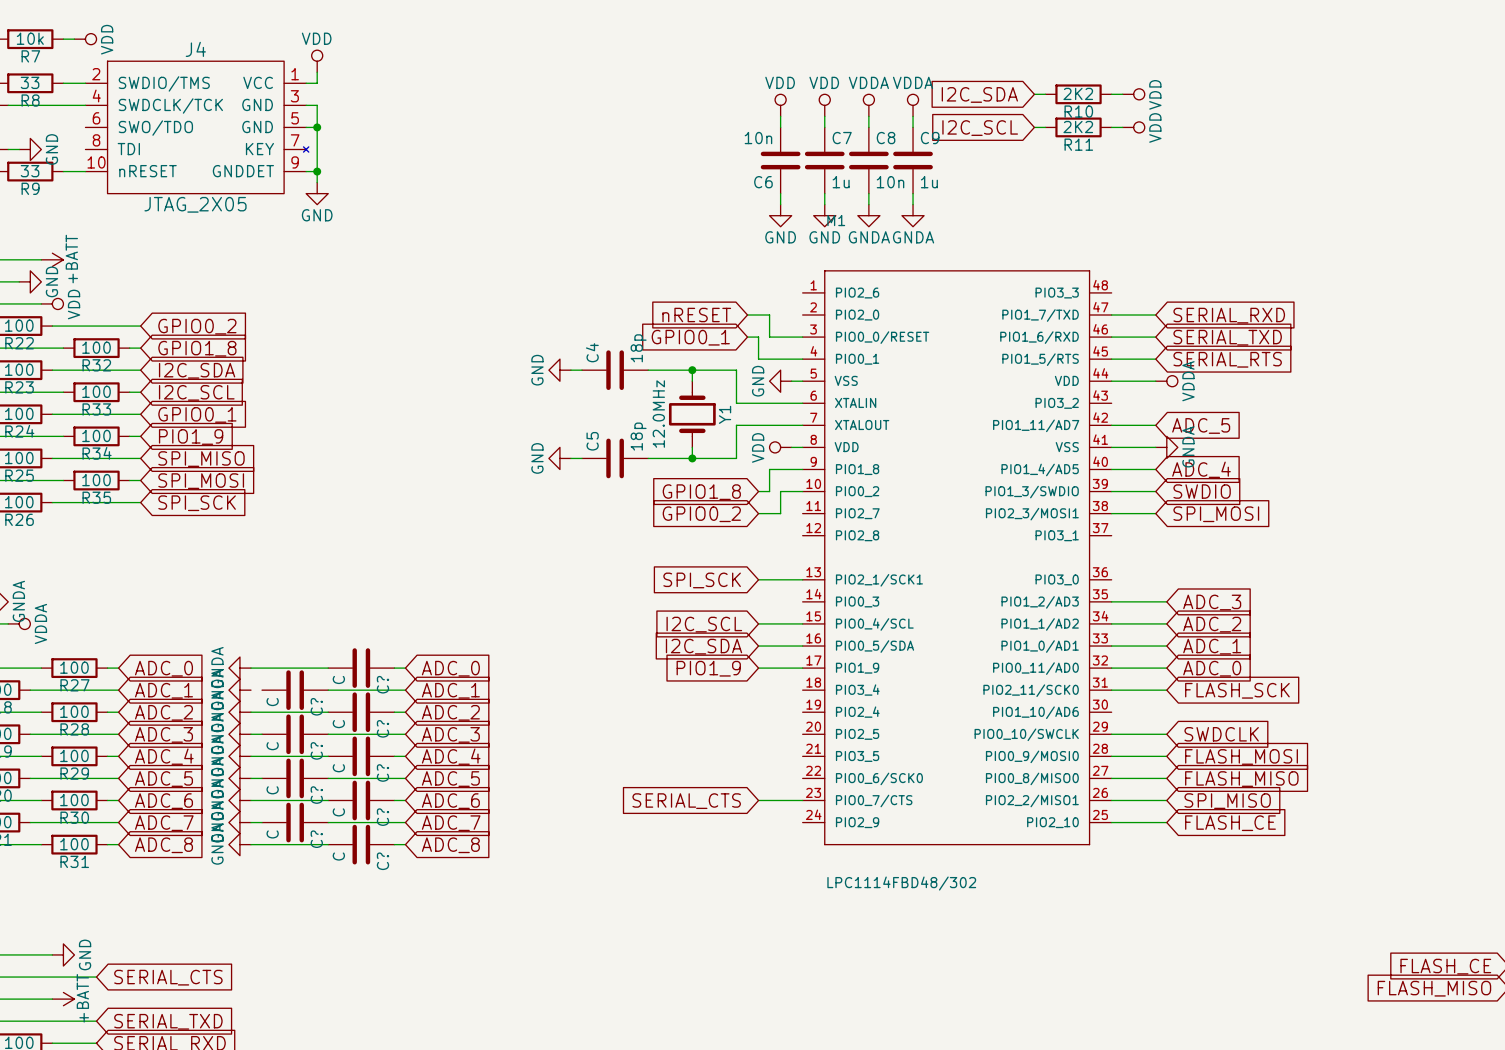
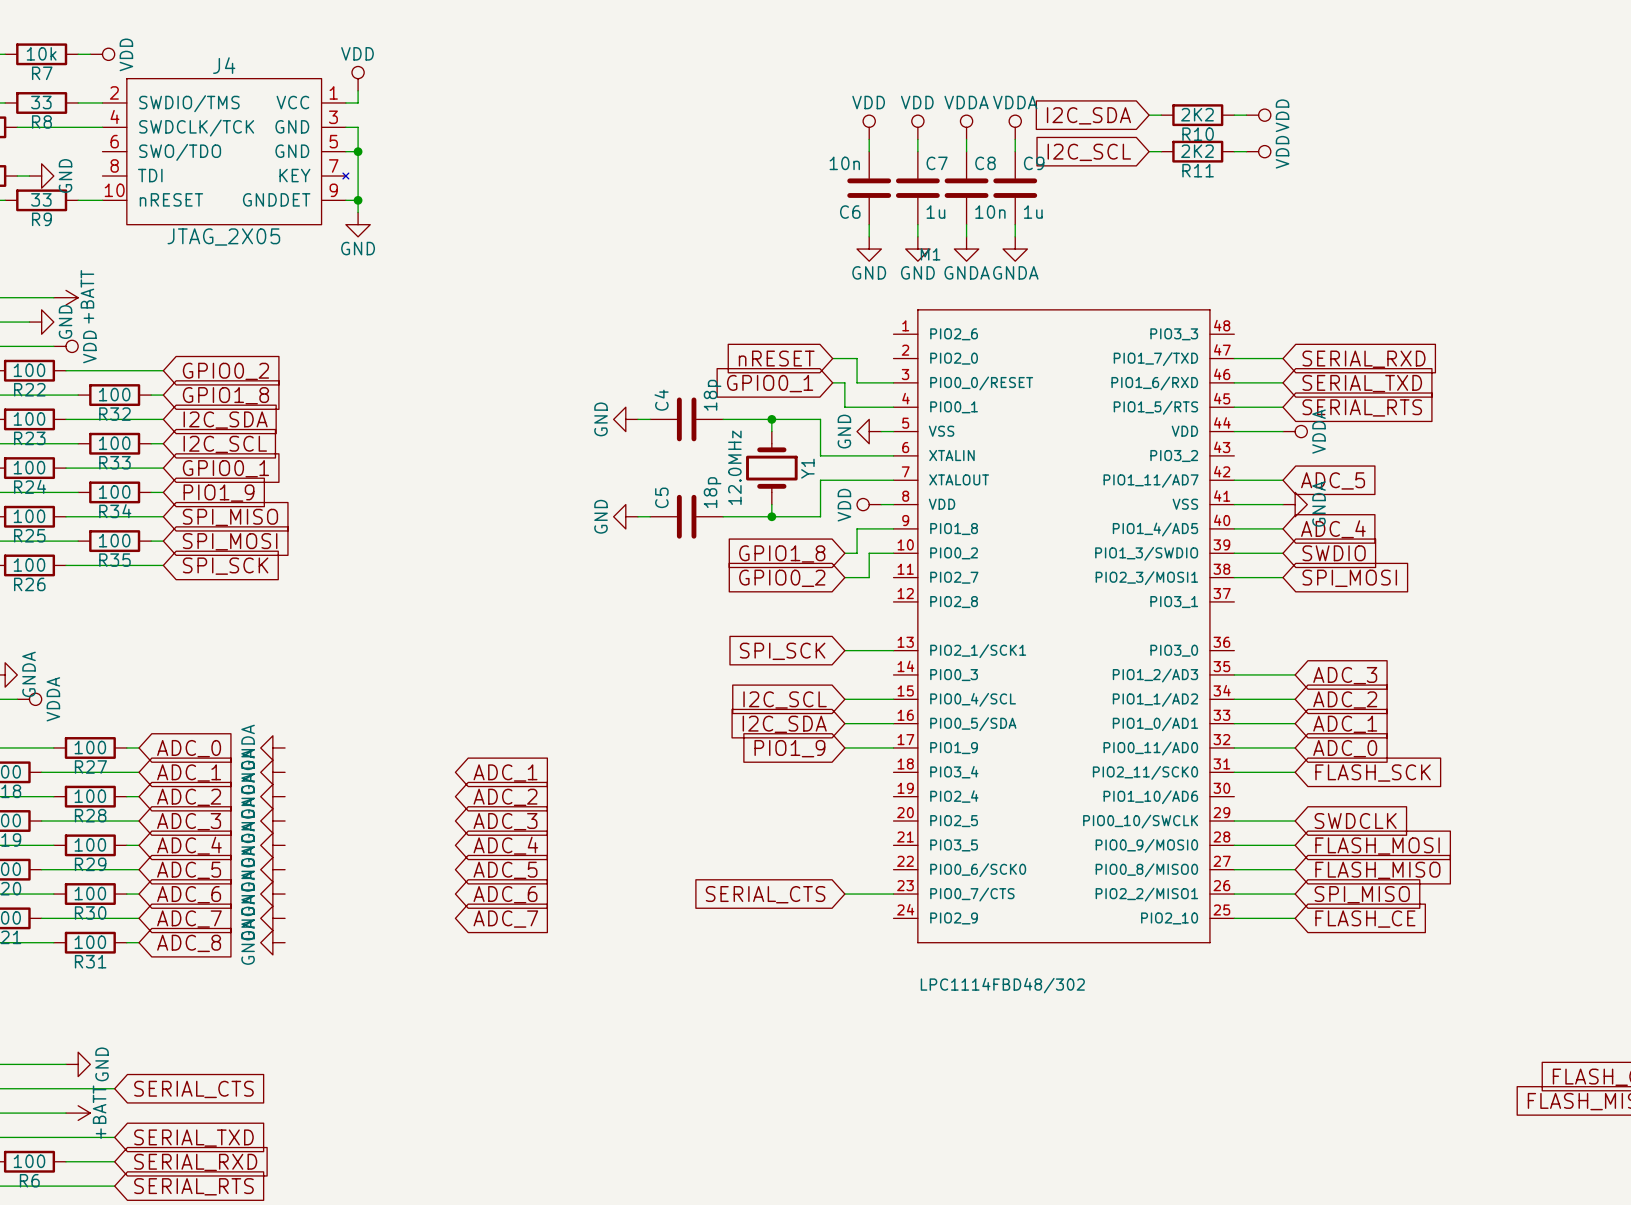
wire: (250, 668) (328, 668) -> none
C?: C (361, 668) -> none
wire: (394, 668) (405, 668) -> none
global label: ADC_0 (450, 668) -> none
C?: C (295, 690) -> none
wire: (328, 690) (405, 690) -> none
wire: (250, 712) (328, 712) -> none
C?: C (361, 712) -> none
wire: (394, 712) (405, 712) -> none
wire: (250, 734) (262, 734) -> none
C?: C (295, 734) -> none
wire: (328, 734) (405, 734) -> none
wire: (250, 756) (328, 756) -> none
C?: C (361, 756) -> none
wire: (394, 756) (405, 756) -> none
wire: (250, 778) (262, 778) -> none
C?: C (295, 778) -> none
wire: (328, 778) (405, 778) -> none
wire: (250, 800) (328, 800) -> none
C?: C (361, 800) -> none
wire: (394, 800) (405, 800) -> none
wire: (250, 822) (262, 822) -> none
C?: C (295, 822) -> none
wire: (328, 822) (405, 822) -> none
wire: (250, 844) (328, 844) -> none
C?: C (361, 844) -> none
wire: (394, 844) (405, 844) -> none
global label: ADC_8 (450, 845) -> none

